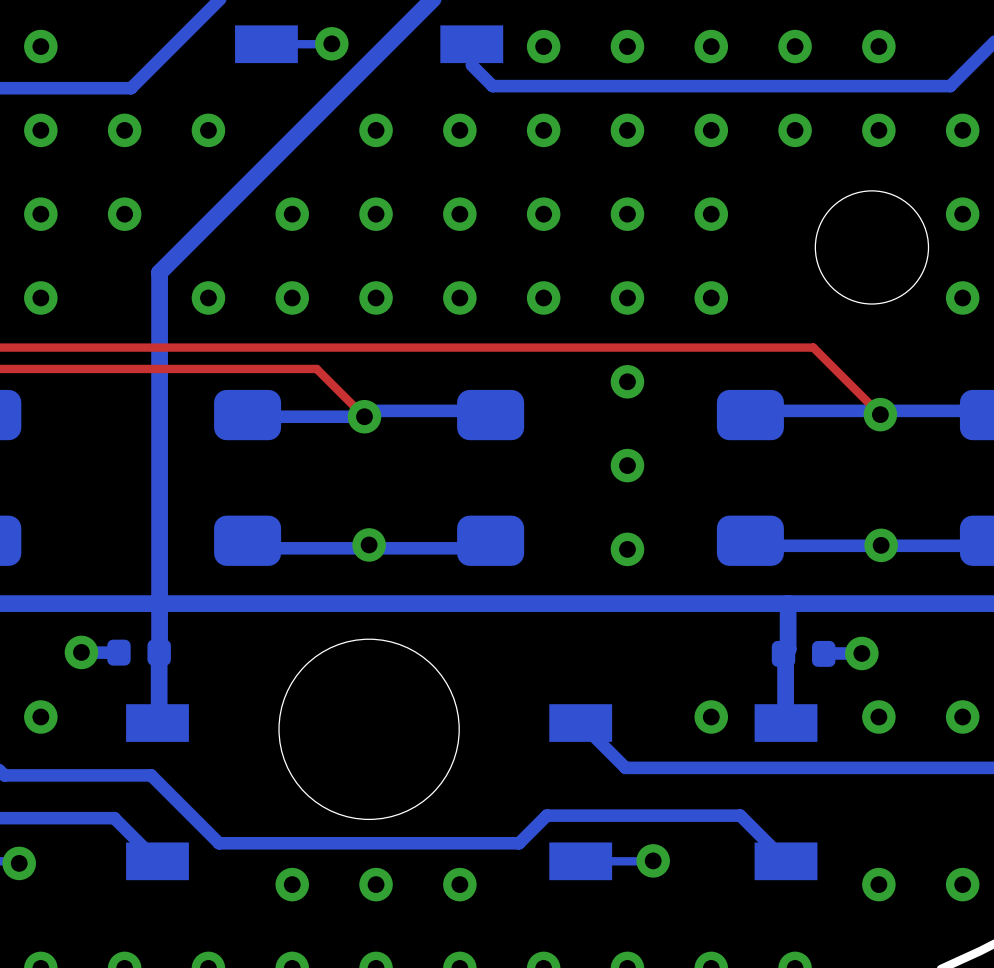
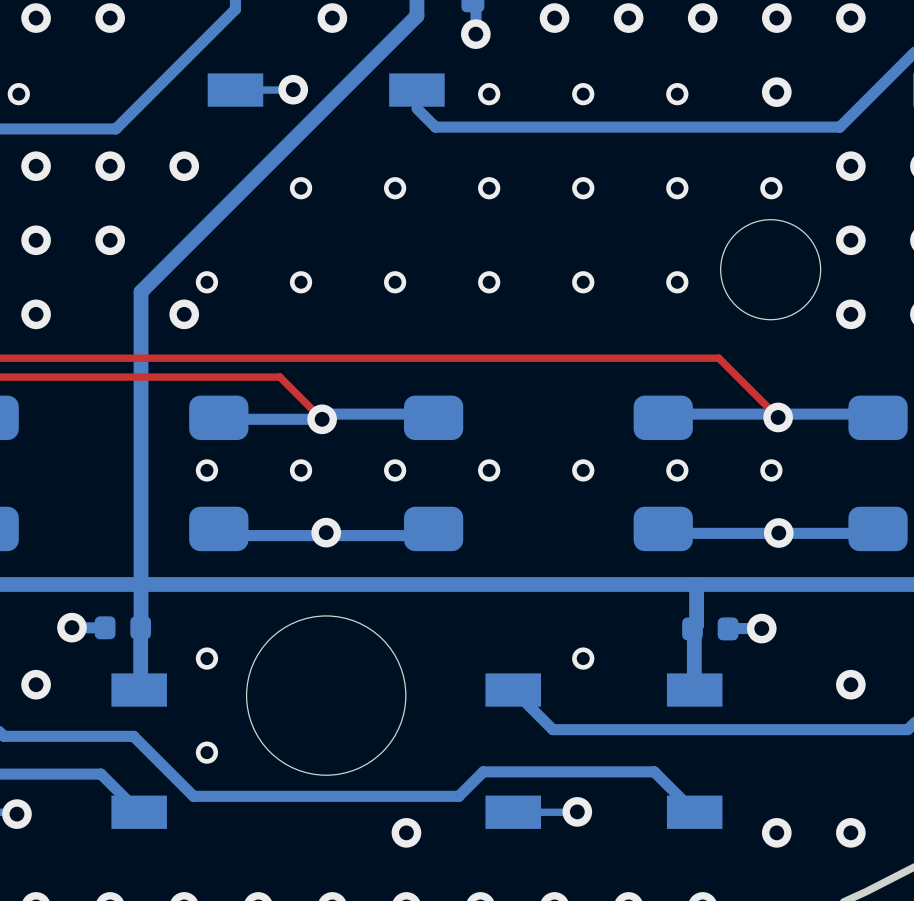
via size: [526, 29, 561, 64] -> [478, 83, 501, 106]
via position: (40, 46) -> (18, 94)
via: (627, 46) -> none
via: (711, 46) -> none
via position: (795, 46) -> (677, 94)
via: none -> (583, 94)
via: (376, 130) -> none
via position: (459, 130) -> (395, 188)
via position: (543, 130) -> (489, 188)
via: (627, 130) -> none
via: (711, 130) -> none
via position: (795, 130) -> (677, 188)
via position: (878, 130) -> (771, 188)
via: none -> (301, 188)
via: none -> (583, 188)
via: (292, 214) -> none
via: (376, 214) -> none
via: (459, 214) -> none
via: (543, 214) -> none
via: (627, 214) -> none
via: (711, 214) -> none
via: none -> (206, 282)
via: none -> (301, 282)
via: none -> (395, 282)
via: none -> (489, 282)
via: none -> (583, 282)
via: none -> (677, 282)
via: (292, 297) -> none
via: (376, 297) -> none
via: (459, 297) -> none
via: (543, 297) -> none
via: (627, 297) -> none
via: (711, 297) -> none
via: (627, 381) -> none
via: (627, 465) -> none
via: none -> (206, 470)
via: none -> (301, 470)
via: none -> (395, 470)
via: none -> (489, 470)
via: none -> (583, 470)
via: none -> (677, 470)
via: none -> (771, 470)
via: (627, 549) -> none
via: none -> (206, 658)
via: none -> (583, 658)
via: (711, 717) -> none
via: (878, 717) -> none
via: none -> (206, 752)
via: (292, 884) -> none
via: (376, 884) -> none

